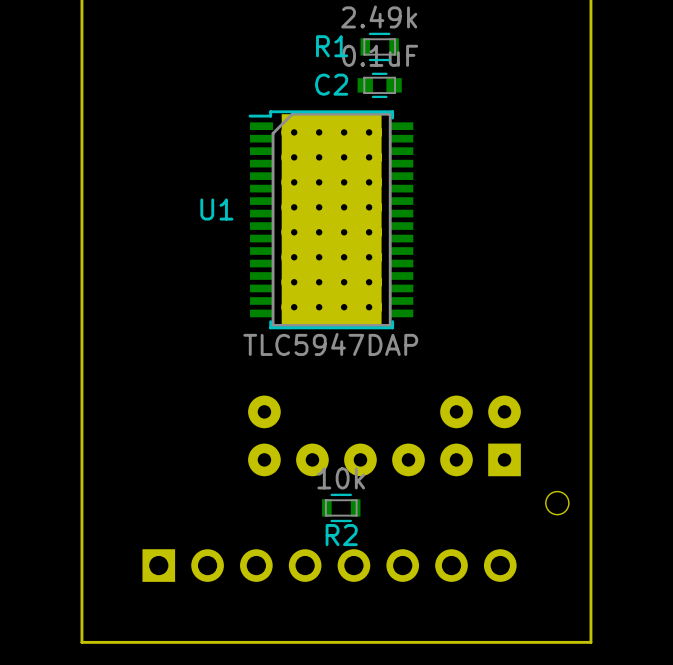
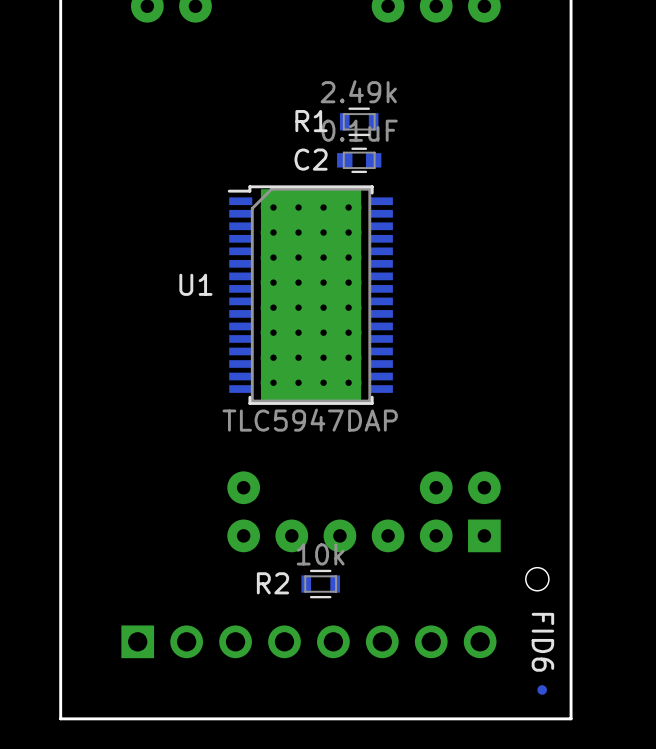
R2 name position: R2 (341, 535) -> R2 (272, 583)
FID6: none -> (542, 689)

